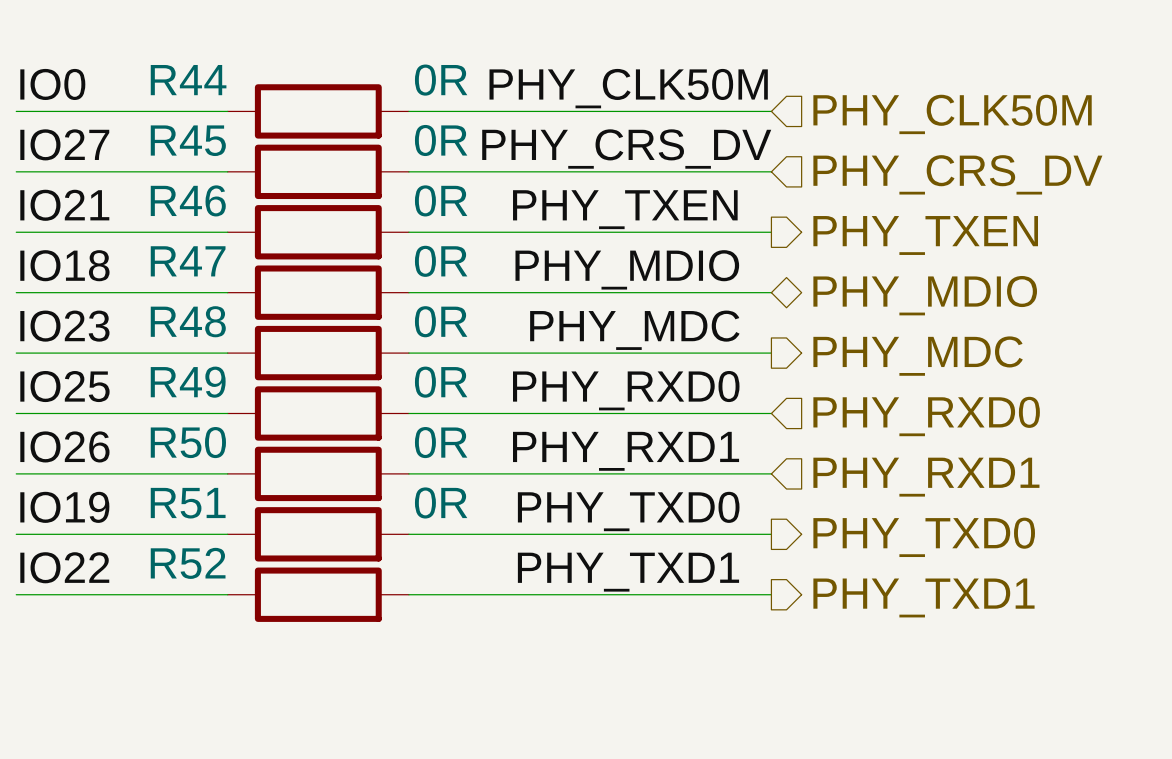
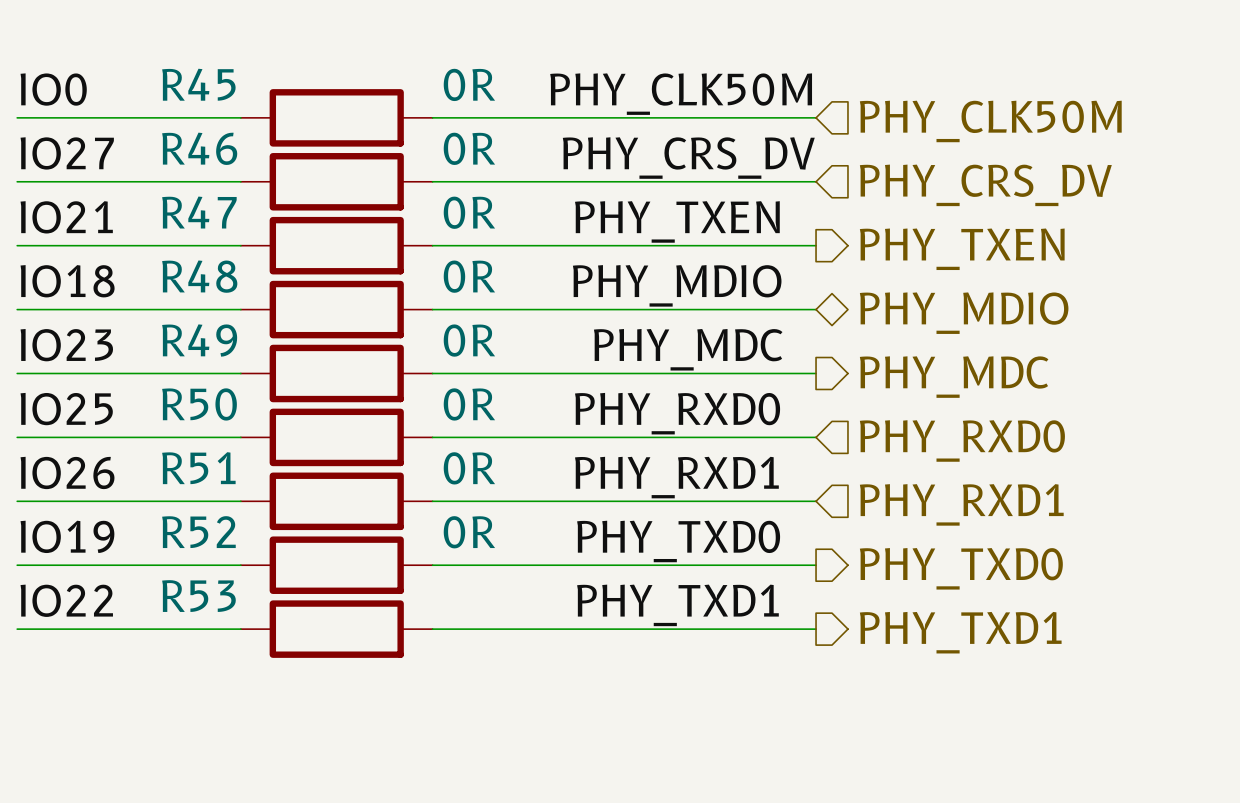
R44 name: R44 (188, 80) -> R45 (198, 84)
R45 name: R45 (188, 140) -> R46 (199, 148)
R46 name: R46 (188, 200) -> R47 (199, 212)
R47 name: R47 (188, 261) -> R48 (199, 276)
R48 name: R48 (188, 321) -> R49 (199, 340)
R49 name: R49 (188, 382) -> R50 (199, 404)
R50 name: R50 (188, 442) -> R51 (198, 468)
R51 name: R51 (188, 503) -> R52 (198, 532)
R52 name: R52 (188, 563) -> R53 (198, 596)

